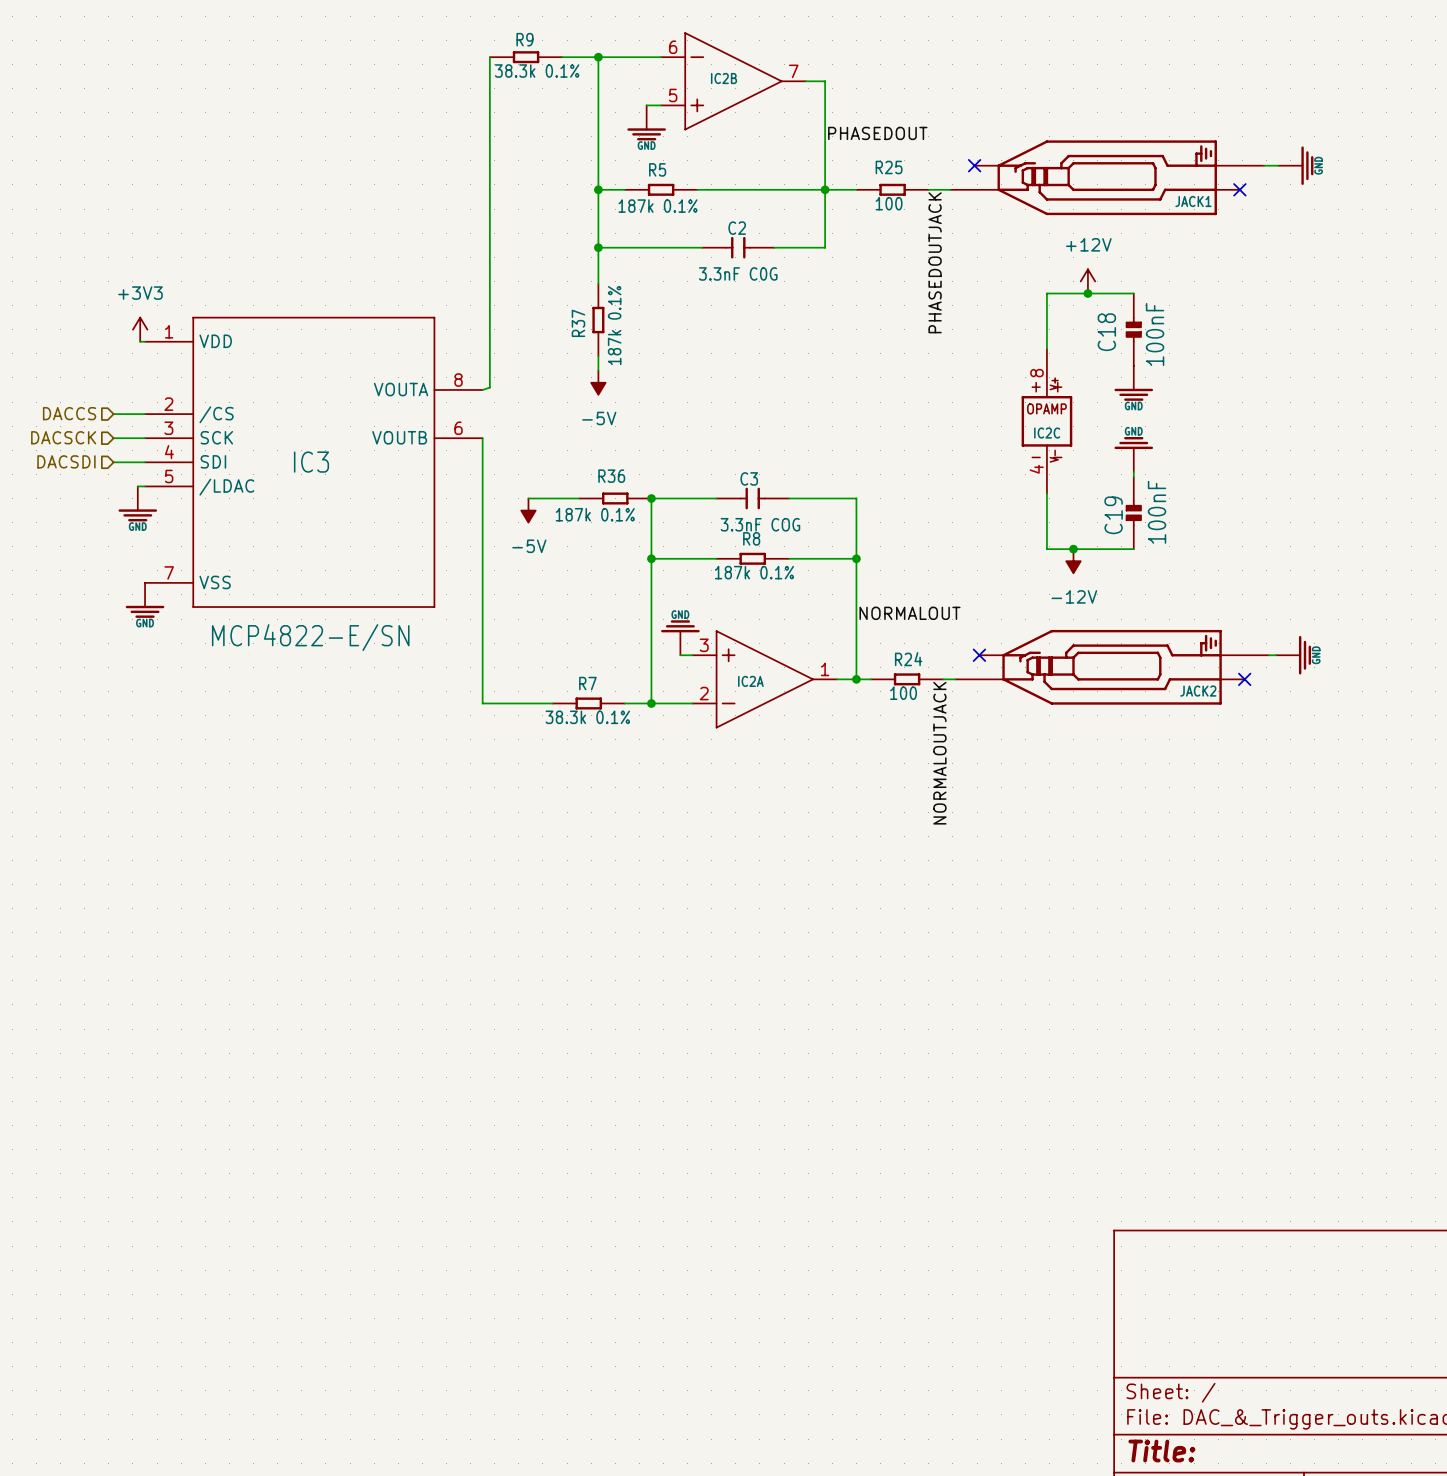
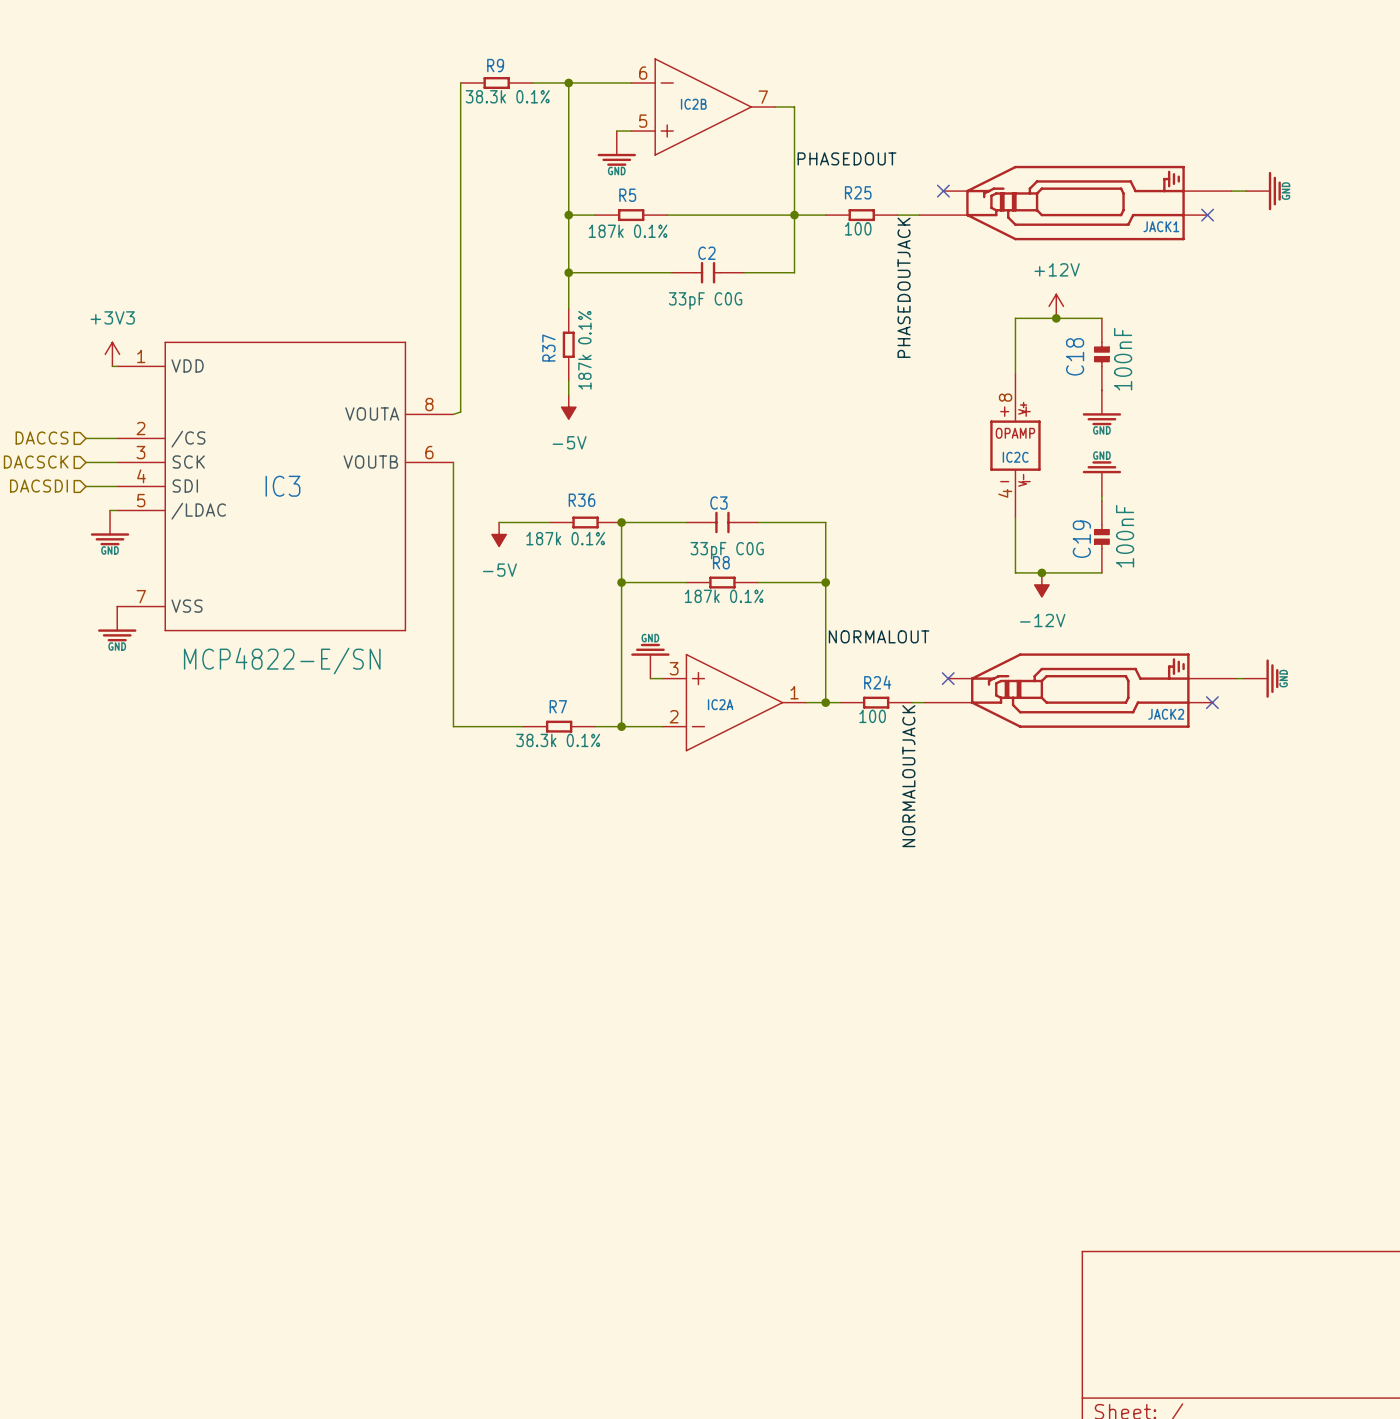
C2 value: 3.3nF C0G (738, 273) -> 33pF C0G (705, 300)
C3 value: 3.3nF COG (760, 524) -> 33pF C0G (727, 550)

